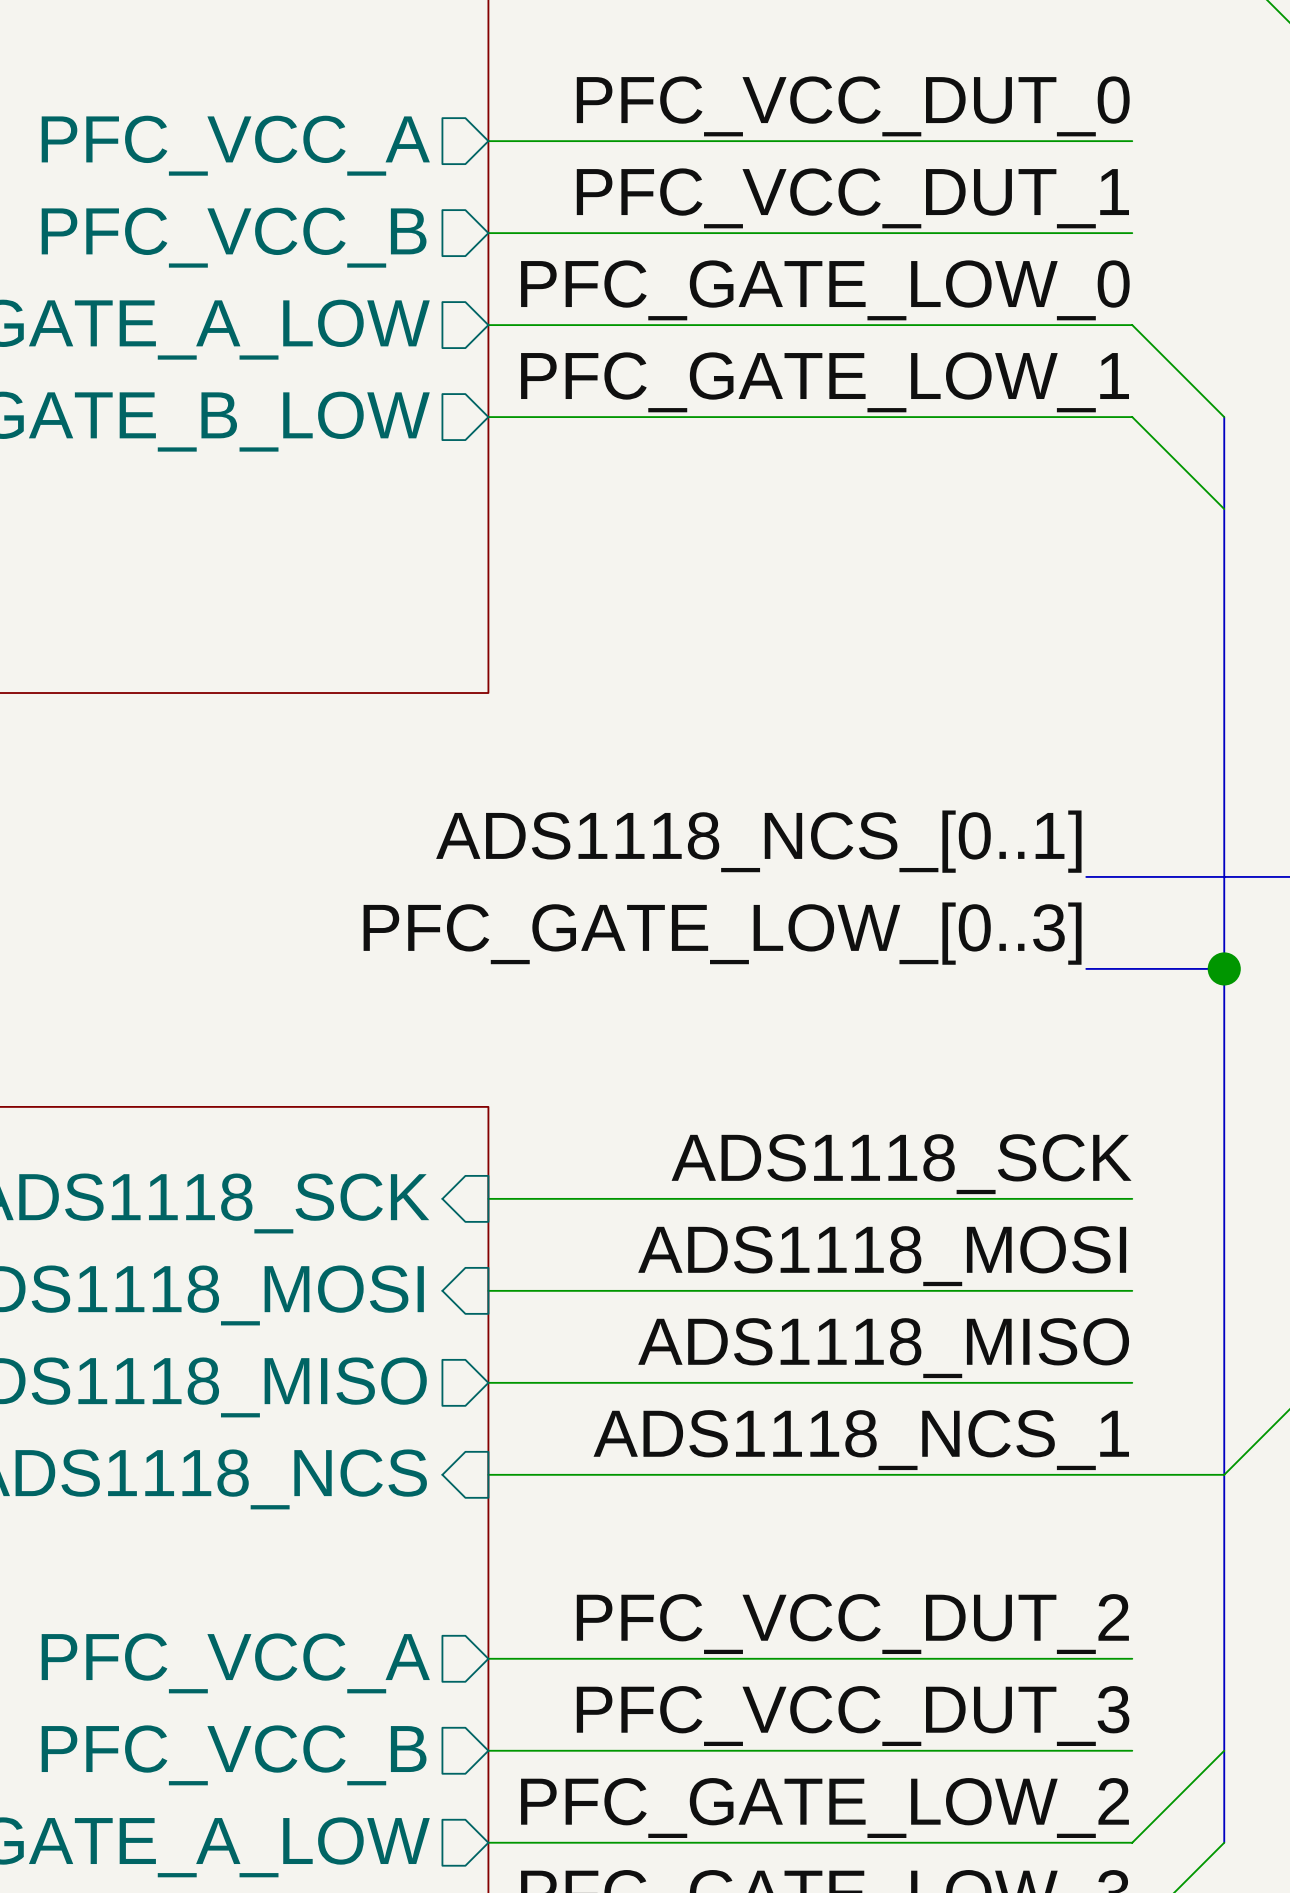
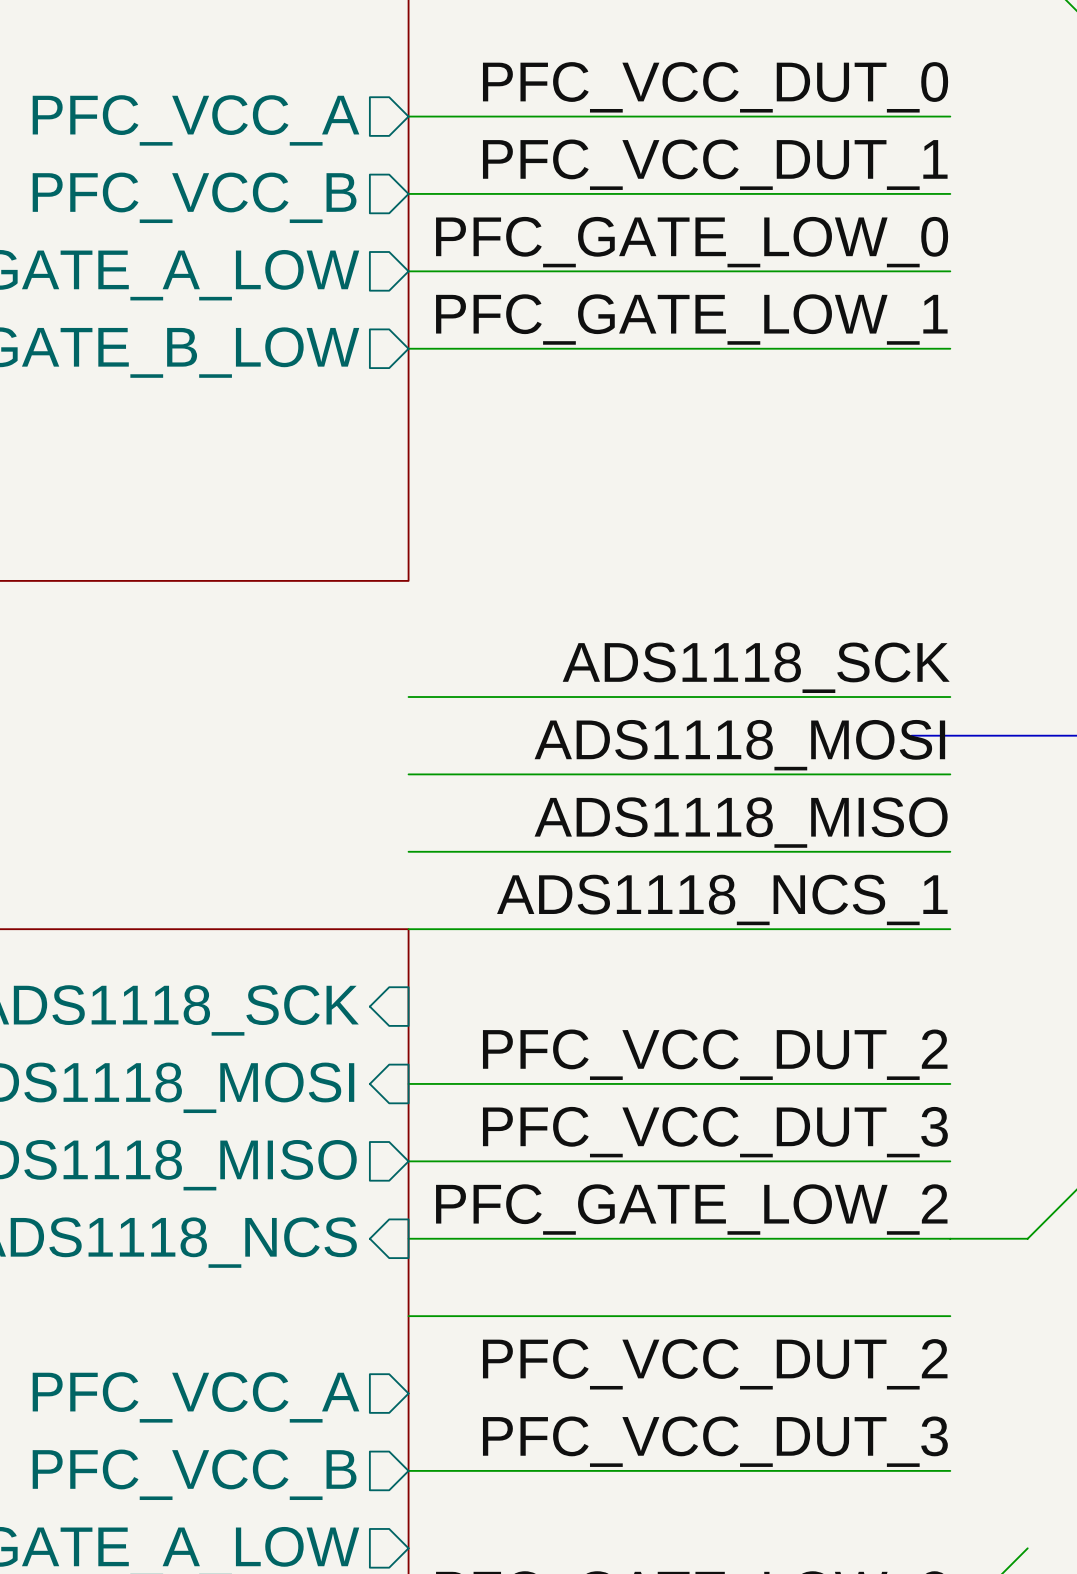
wire: (1132, 325) (1224, 417) -> none
wire: (1132, 417) (1224, 509) -> none
bus: (1224, 417) (1224, 1842) -> none
label: ADS1118_NCS_[0..1] (758, 841) -> none
label: none -> ADS1118_MOSI (739, 745)
wire: none -> (408, 774) (950, 774)
label: PFC_GATE_LOW_[0..3] (722, 933) -> none
bus: (1086, 968) (1224, 968) -> none
junction: (1224, 968) -> none
label: none -> ADS1118_MISO (741, 822)
wire: none -> (408, 851) (950, 851)
label: none -> ADS1118_NCS_1 (722, 899)
label position: ADS1118_SCK (901, 1164) -> ADS1118_SCK (756, 667)
wire: (488, 1198) (1132, 1198) -> (408, 697) (950, 697)
label: ADS1118_MOSI (882, 1256) -> PFC_VCC_DUT_2 (715, 1054)
label: ADS1118_MISO (883, 1348) -> PFC_VCC_DUT_3 (715, 1132)
label: ADS1118_NCS_1 (861, 1440) -> PFC_GATE_LOW_2 (691, 1209)
wire: none -> (408, 1316) (950, 1316)
wire: (488, 1658) (1132, 1658) -> (408, 929) (950, 929)
wire: (1224, 1750) (1132, 1842) (488, 1842) -> none
label: PFC_GATE_LOW_2 (824, 1808) -> none

